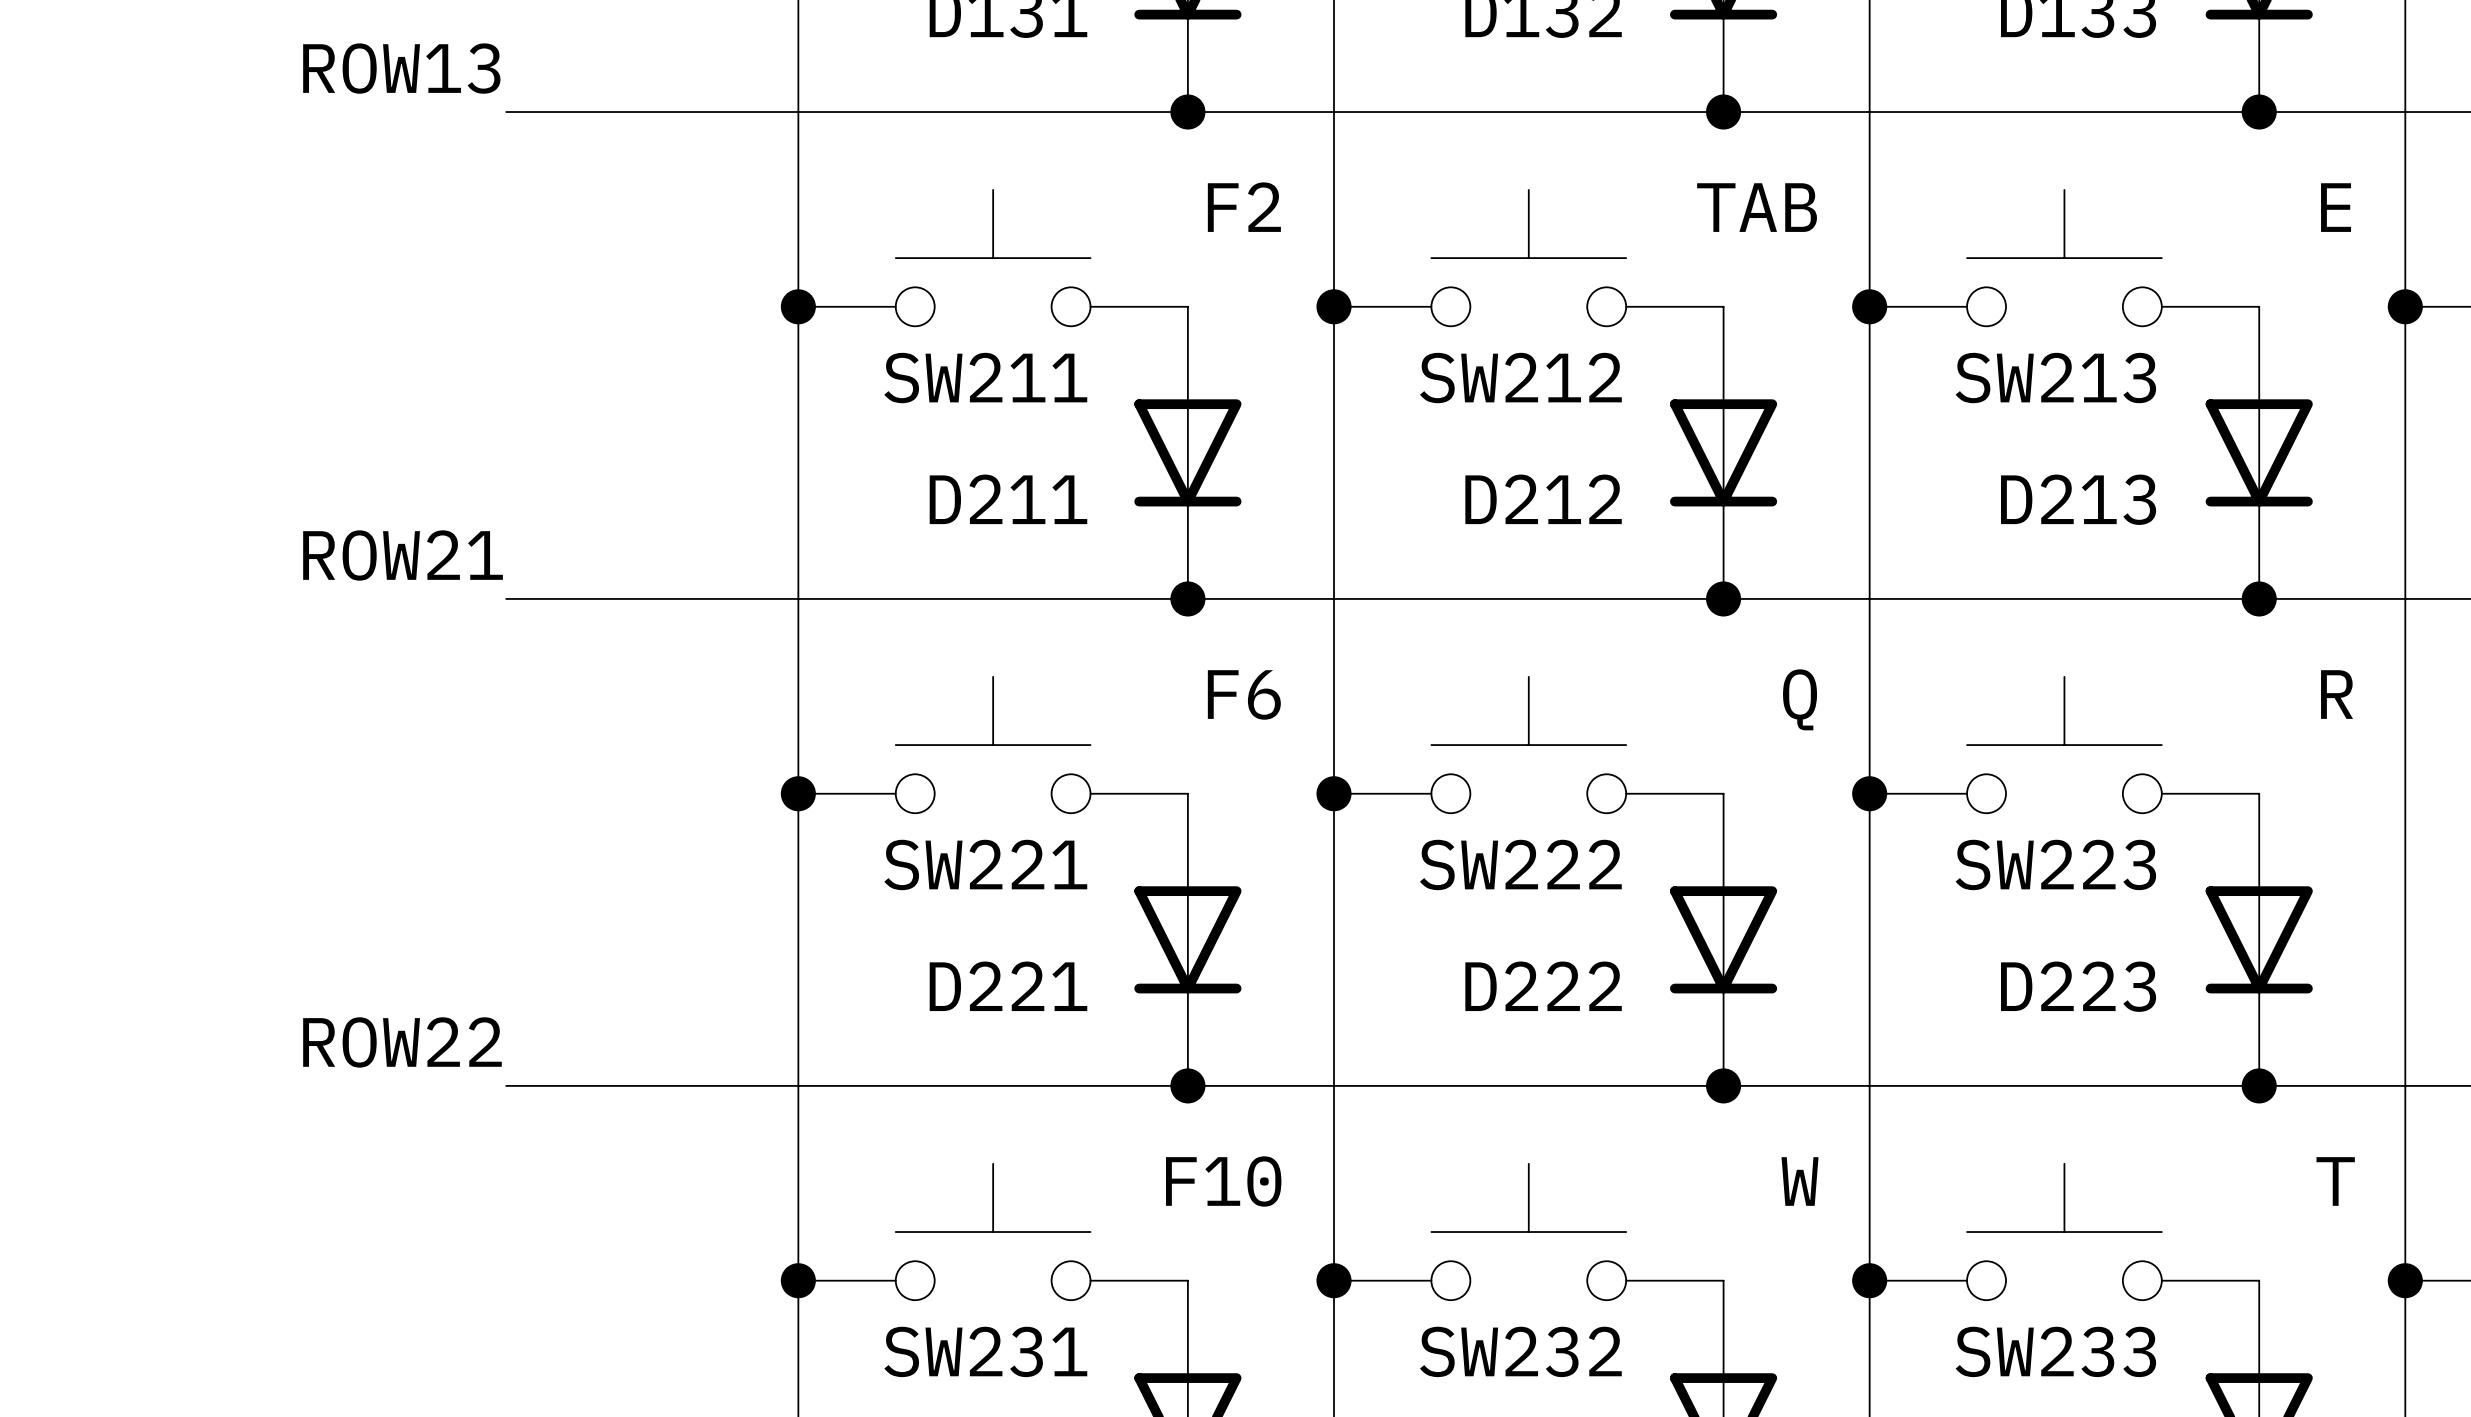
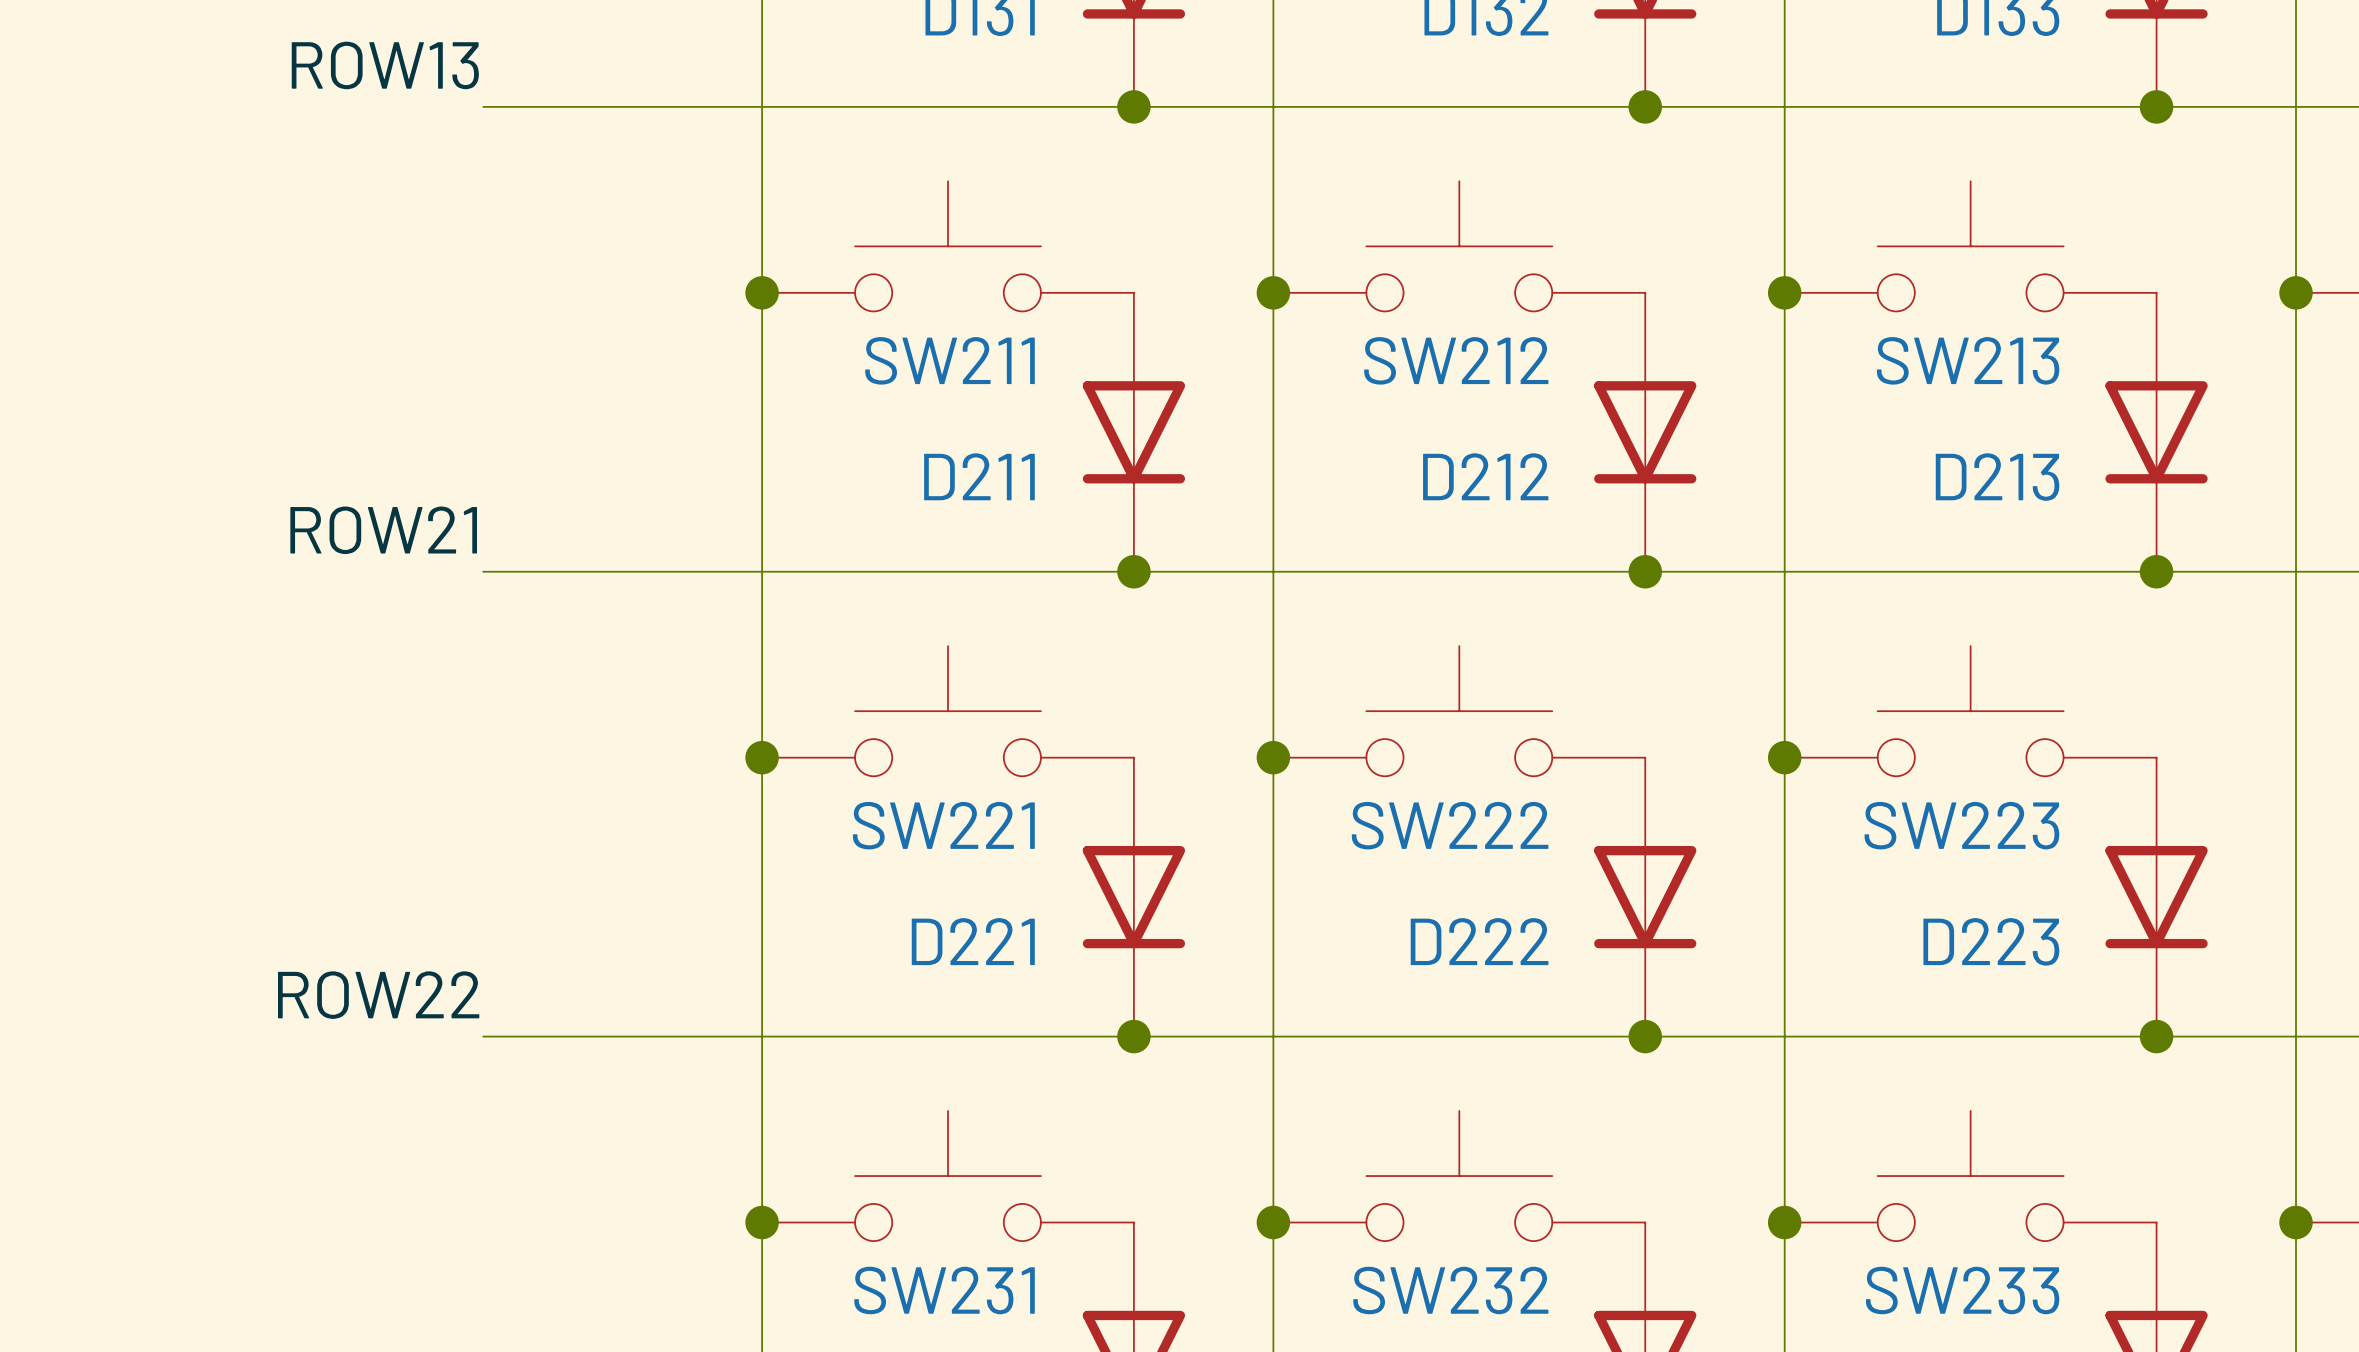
SW211 value: F2 (1244, 207) -> none
SW212 value: TAB (1757, 207) -> none
SW213 value: E (2336, 207) -> none
SW221 value: F6 (1244, 694) -> none
SW223 value: R (2337, 694) -> none
SW222 value: Q (1800, 699) -> none
SW231 value: F10 (1223, 1181) -> none
SW232 value: W (1800, 1181) -> none
SW233 value: T (2335, 1181) -> none

